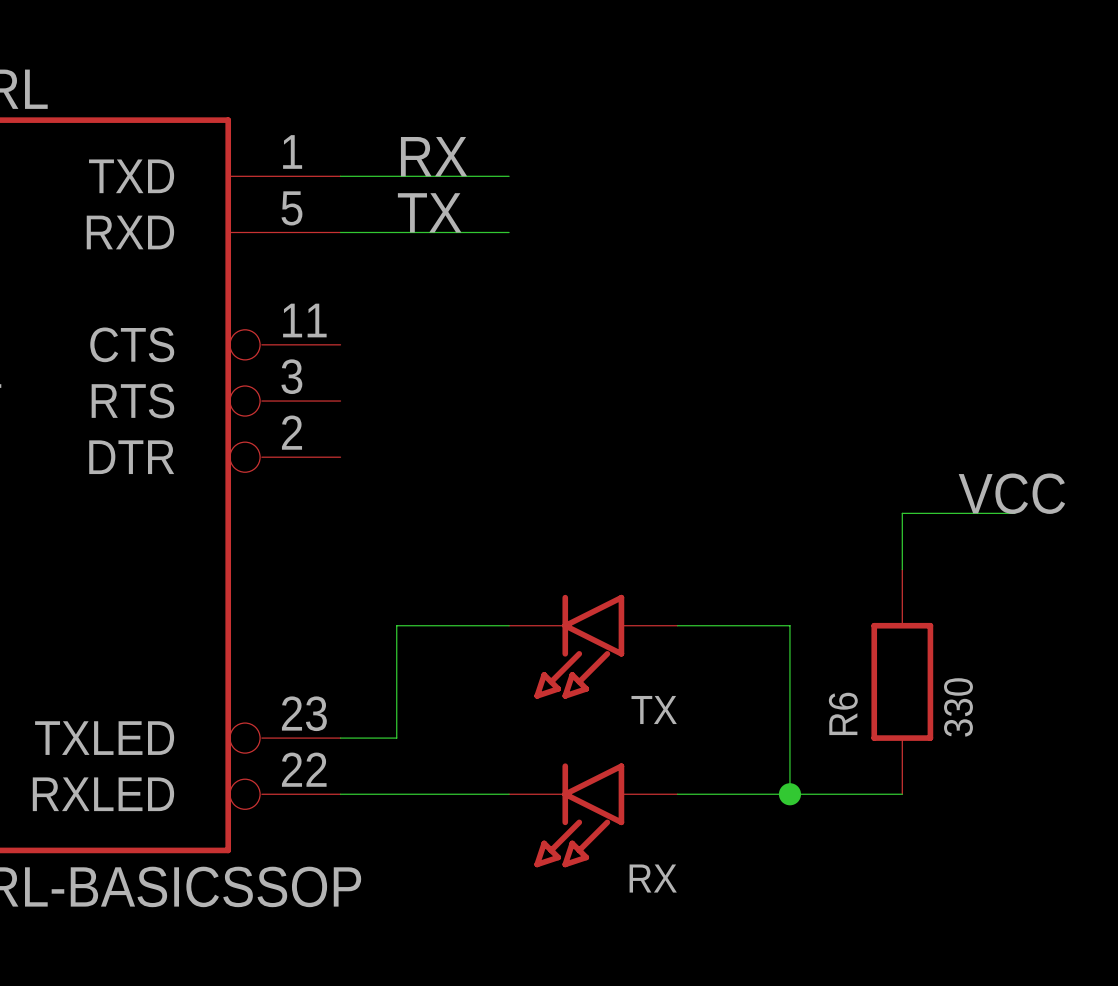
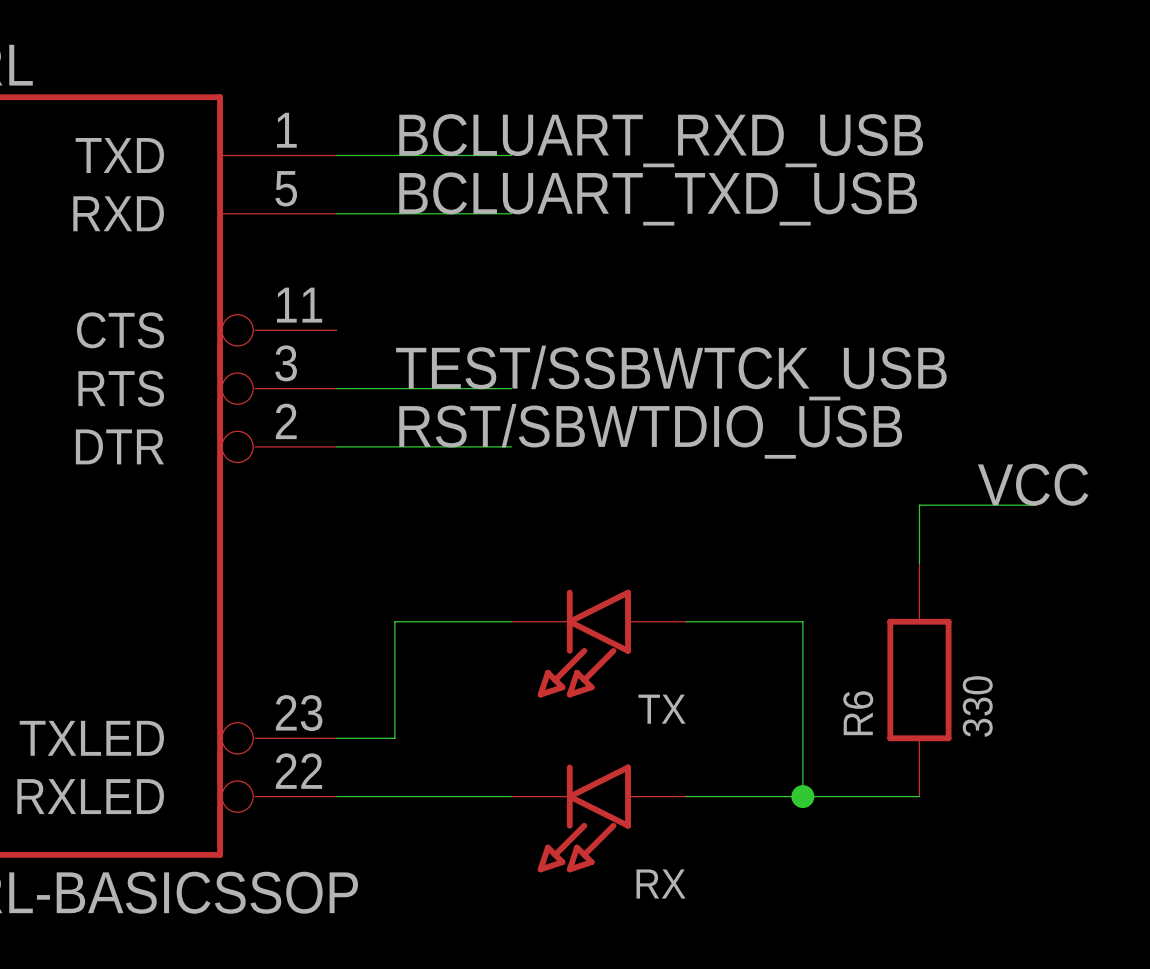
label: RX (434, 156) -> BCLUART_RXD_USB (661, 140)
label: TX (429, 212) -> BCLUART_TXD_USB (658, 198)
label: none -> TEST/SSBWTCK_USB (671, 373)
wire: none -> (336, 388) (511, 388)
label: none -> RST/SBWTDIO_USB (650, 431)
wire: none -> (336, 446) (511, 446)

